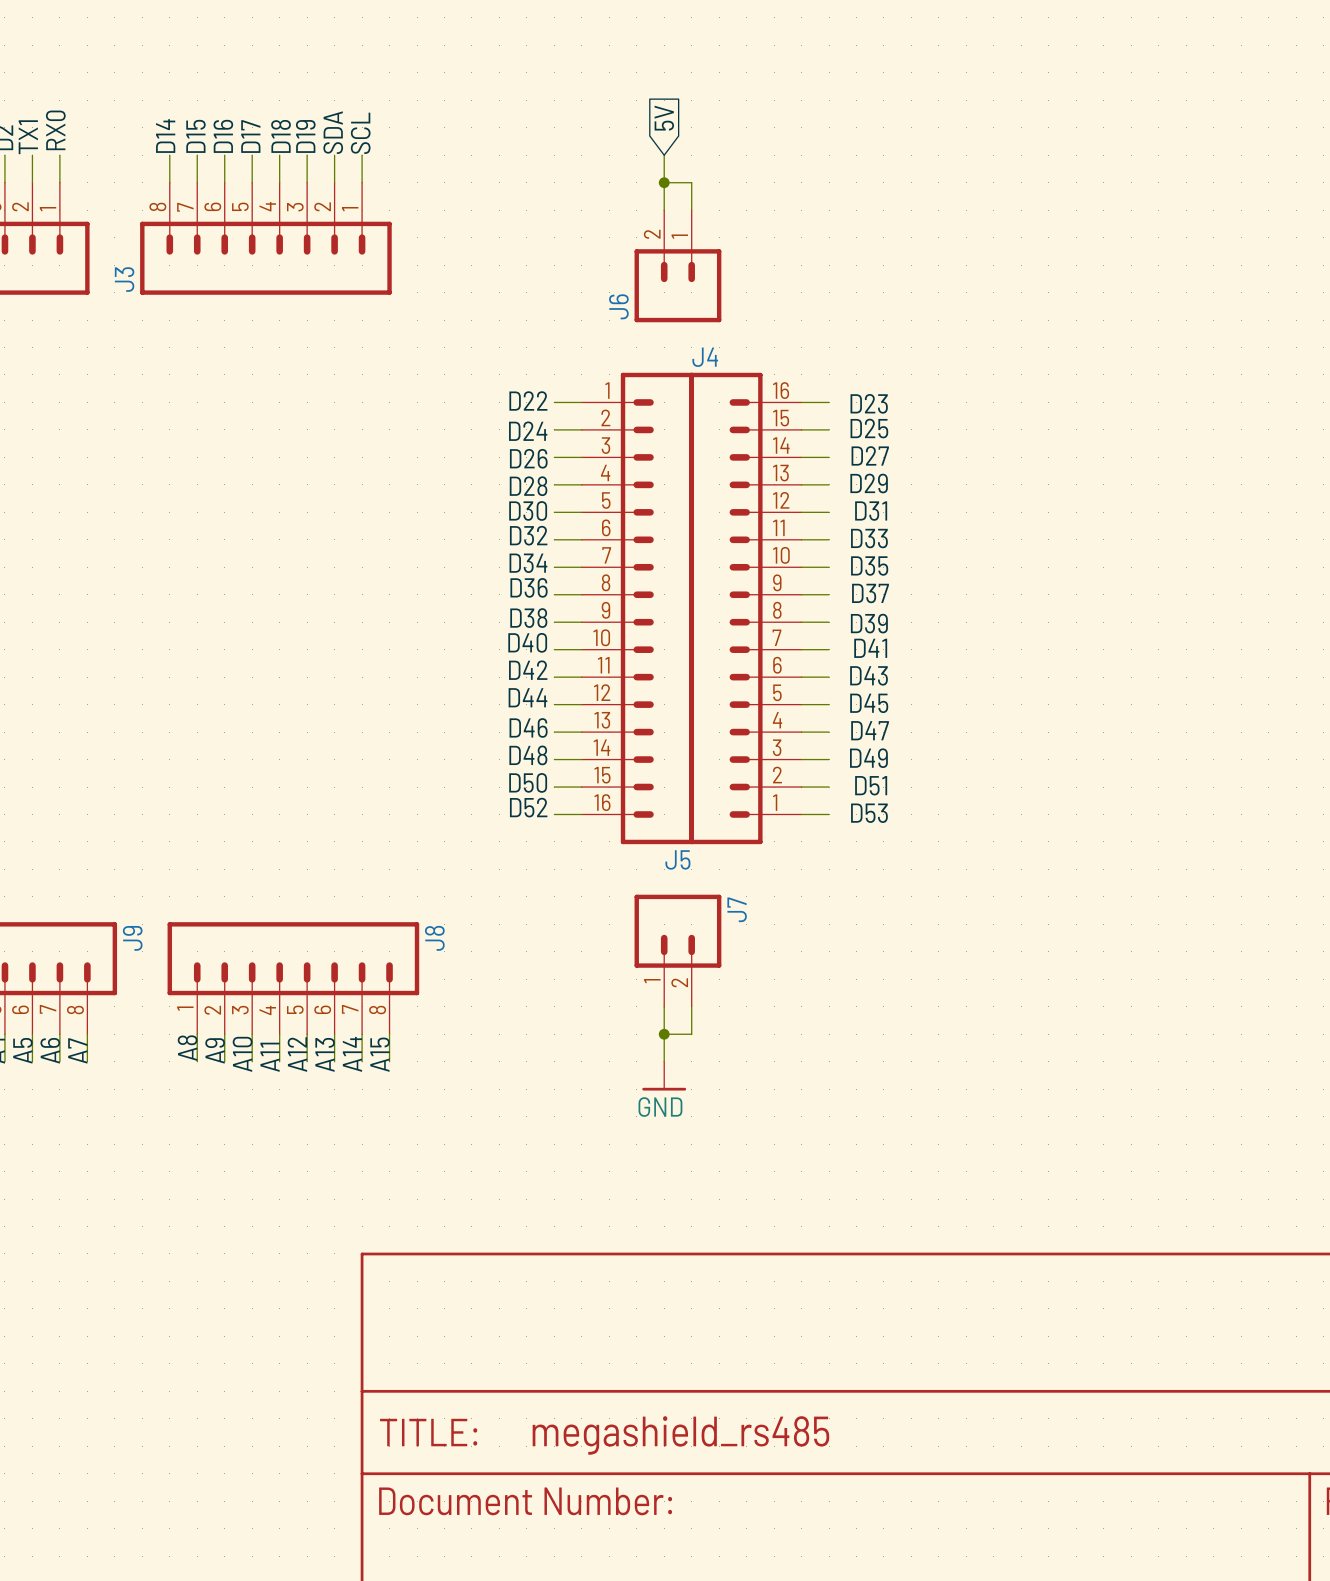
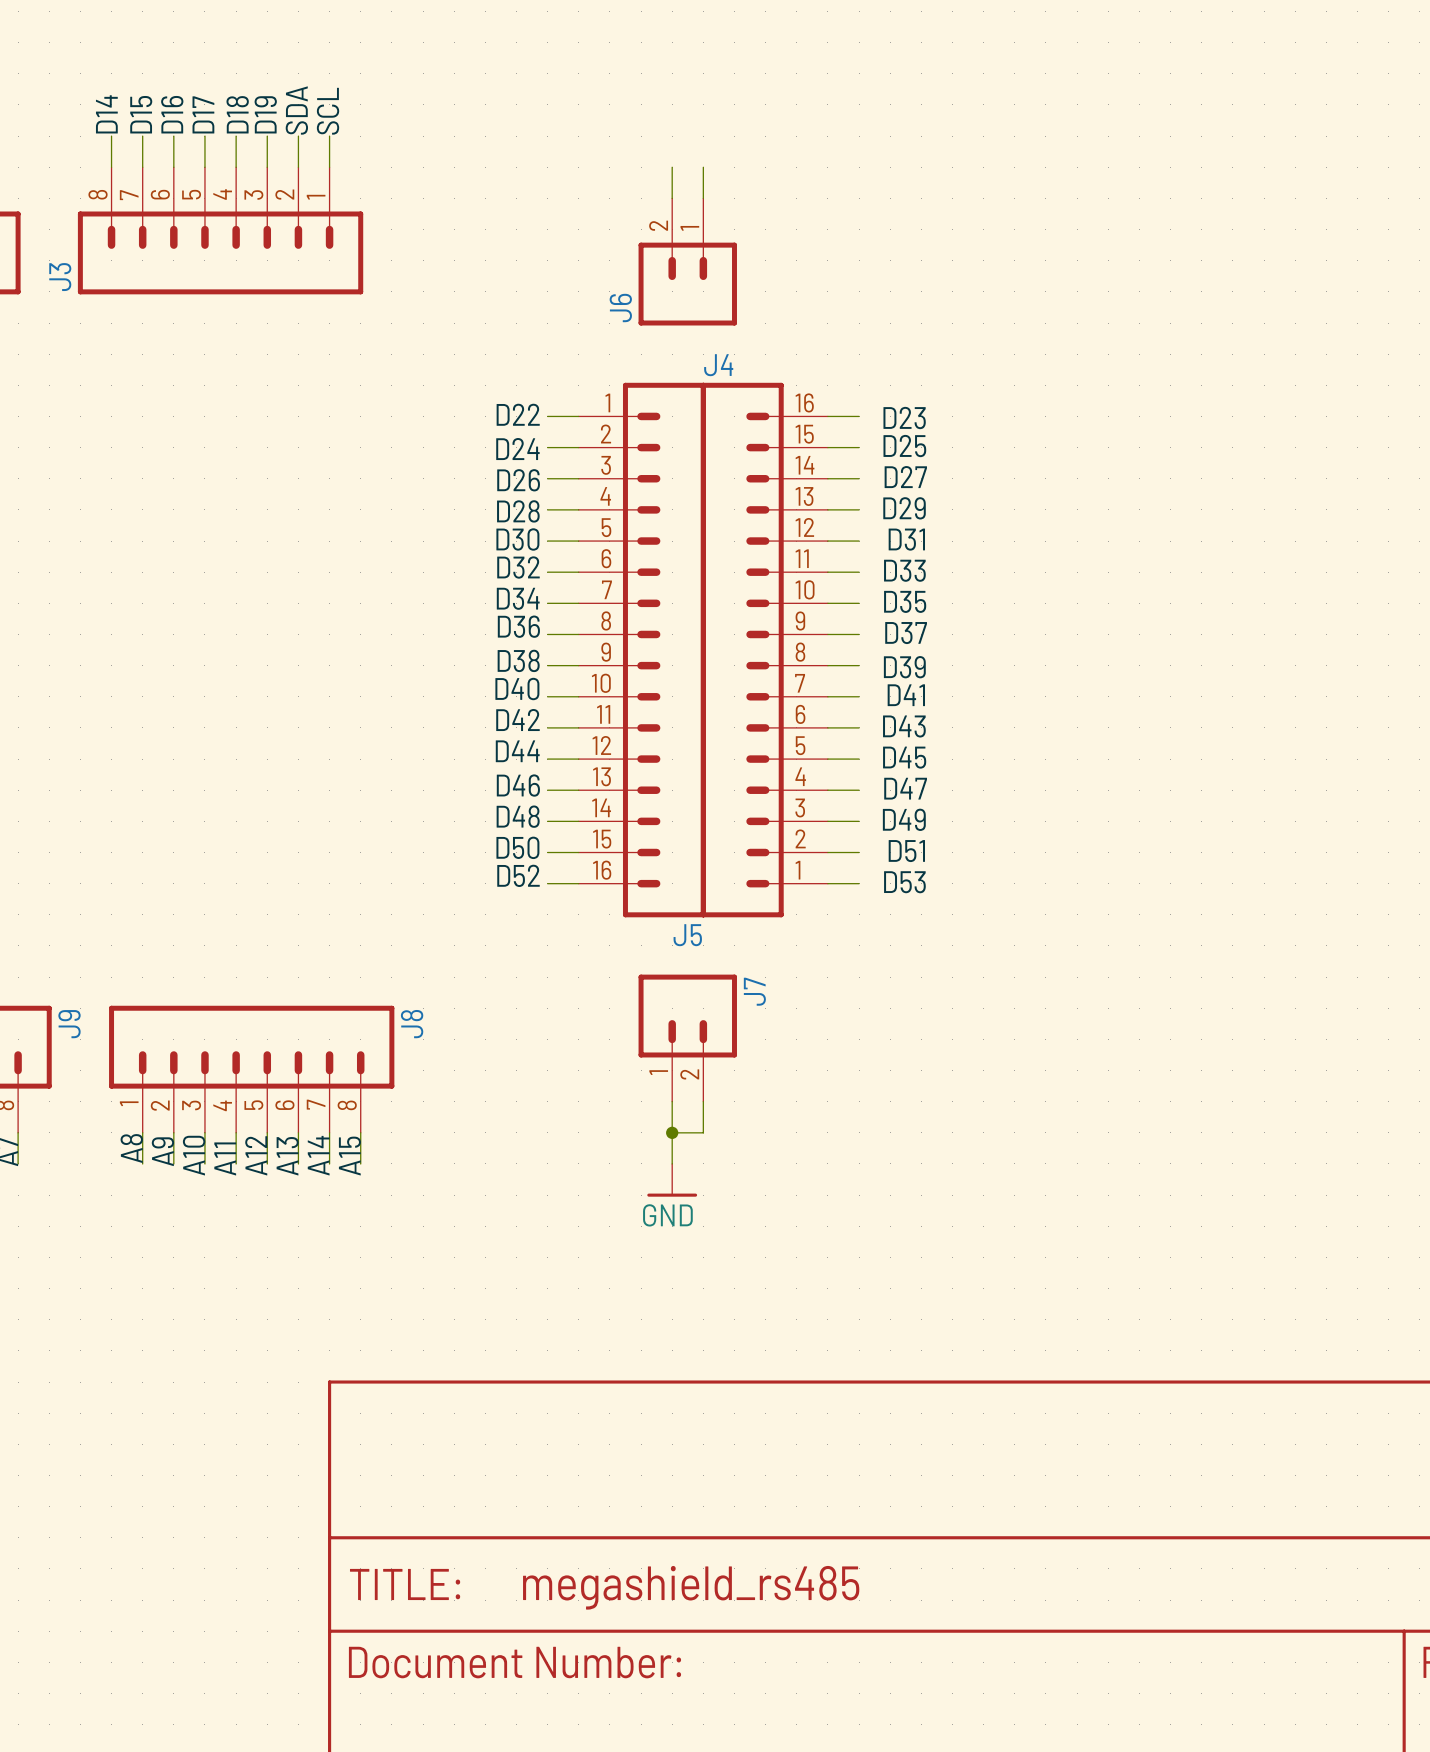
global label: 5V (664, 118) -> none
wire: (664, 155) (664, 182) (691, 182) -> none
junction: (664, 182) -> none

